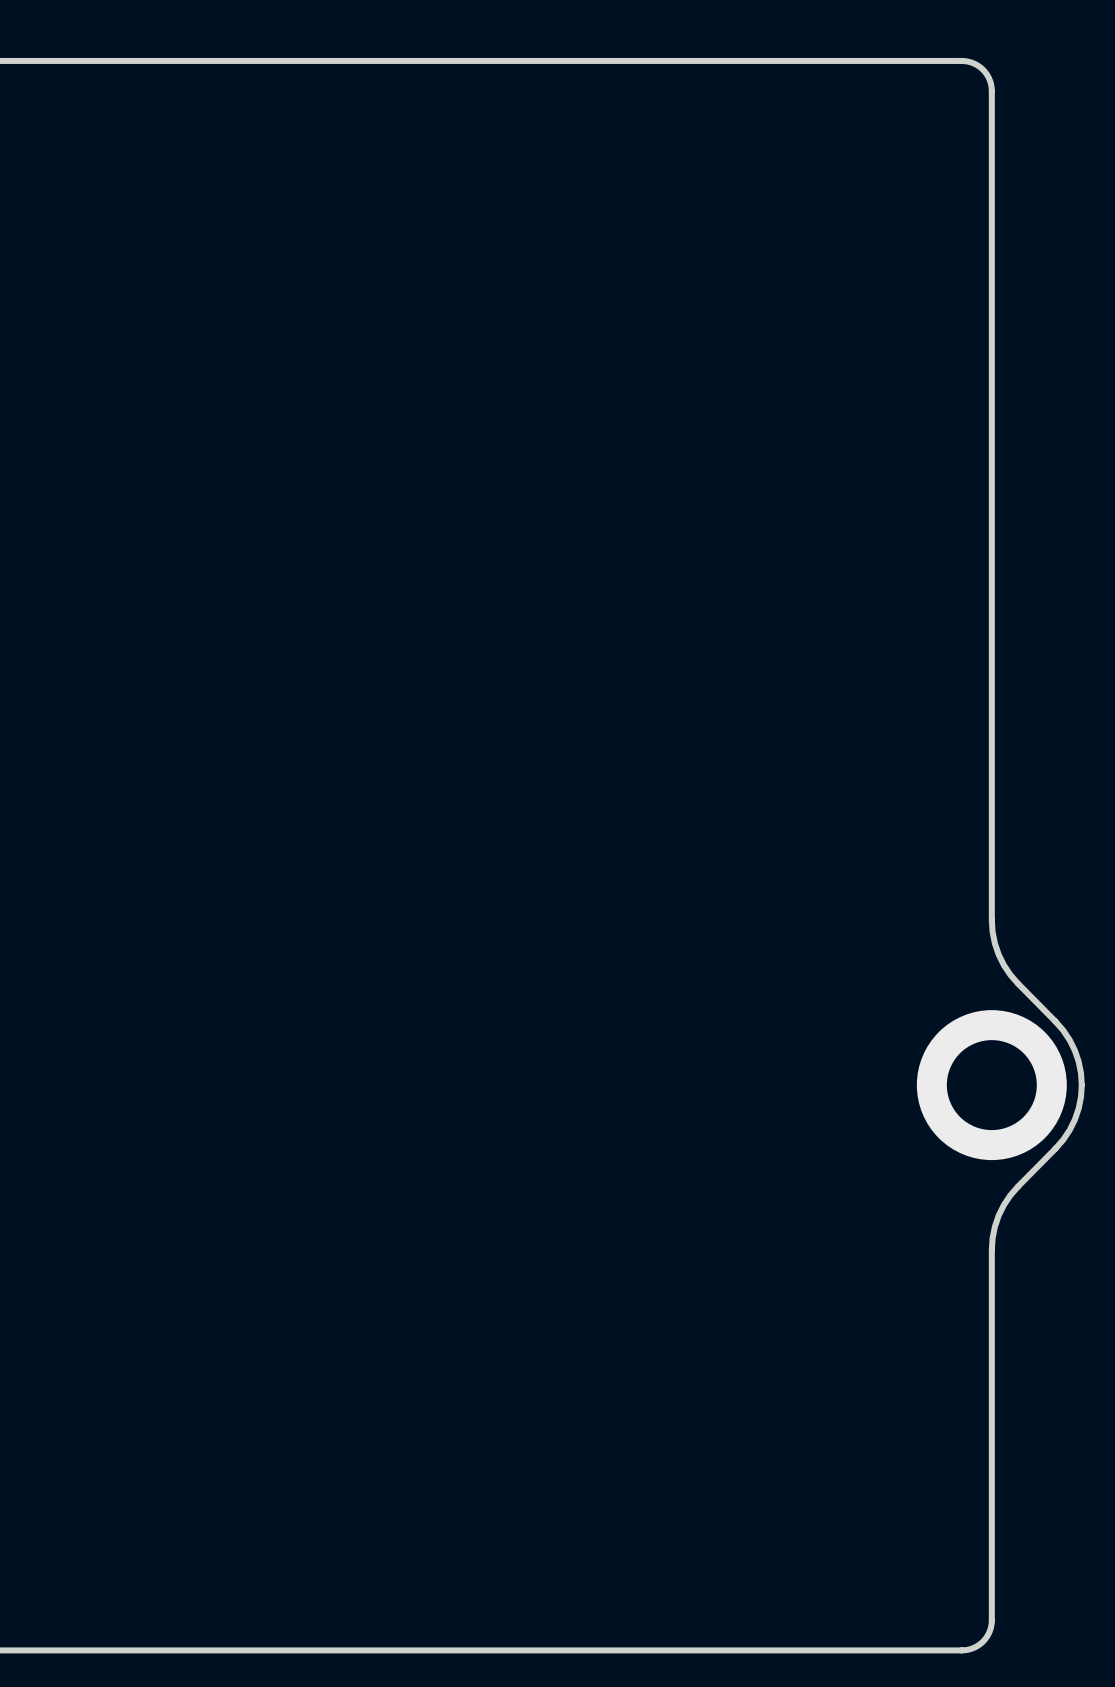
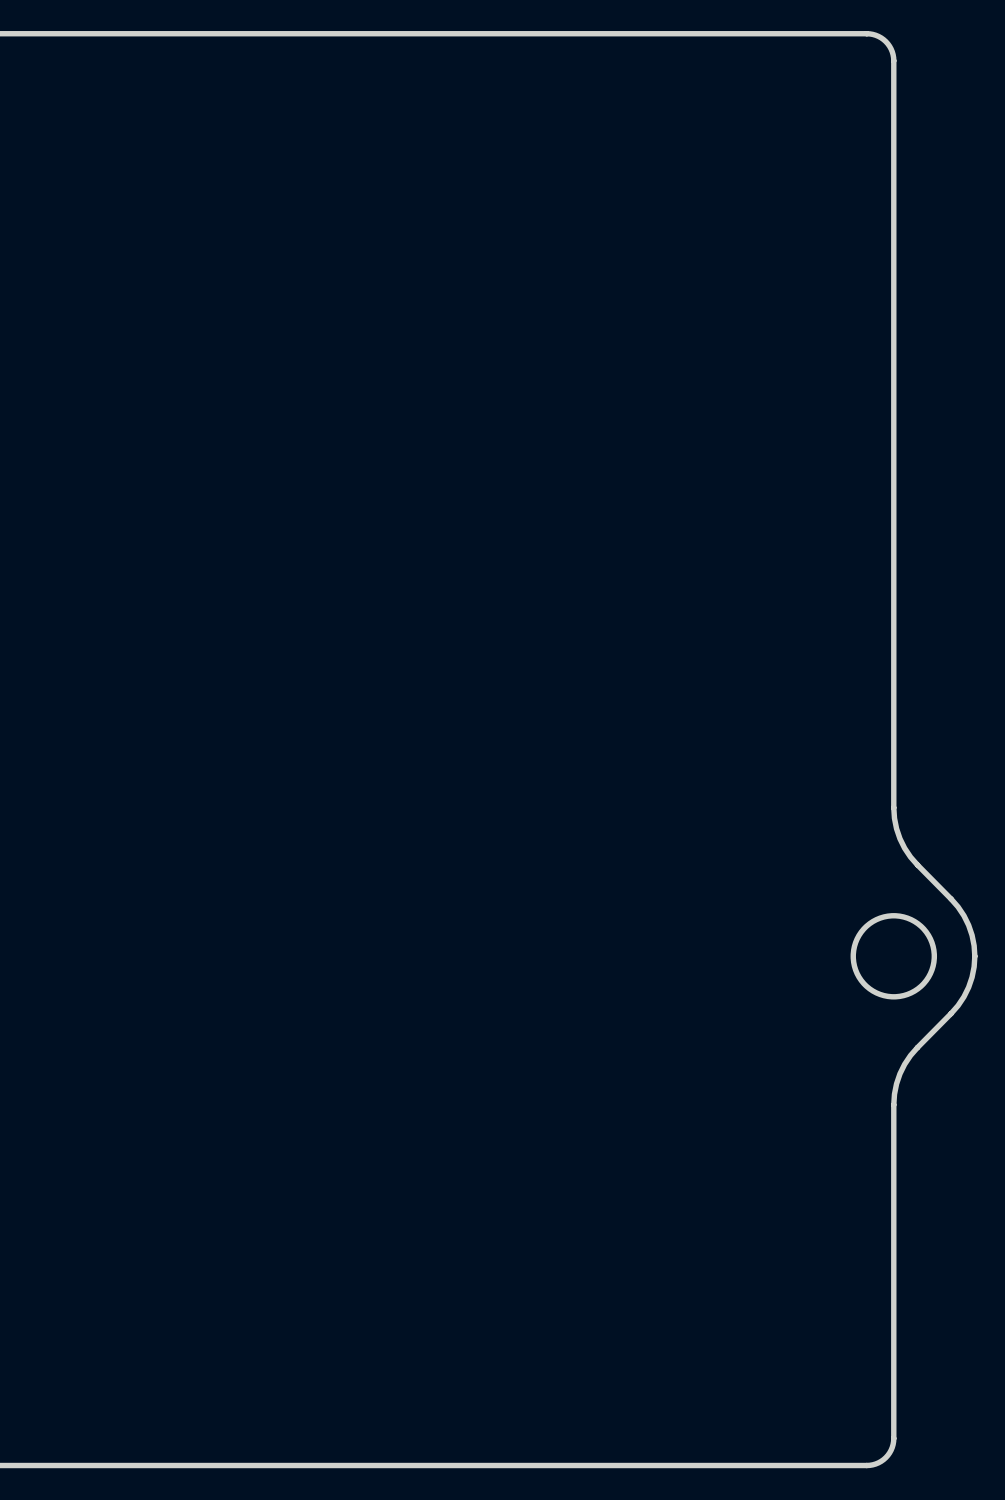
round board edge: none -> [850, 913, 938, 1000]
via: (991, 1085) -> none

